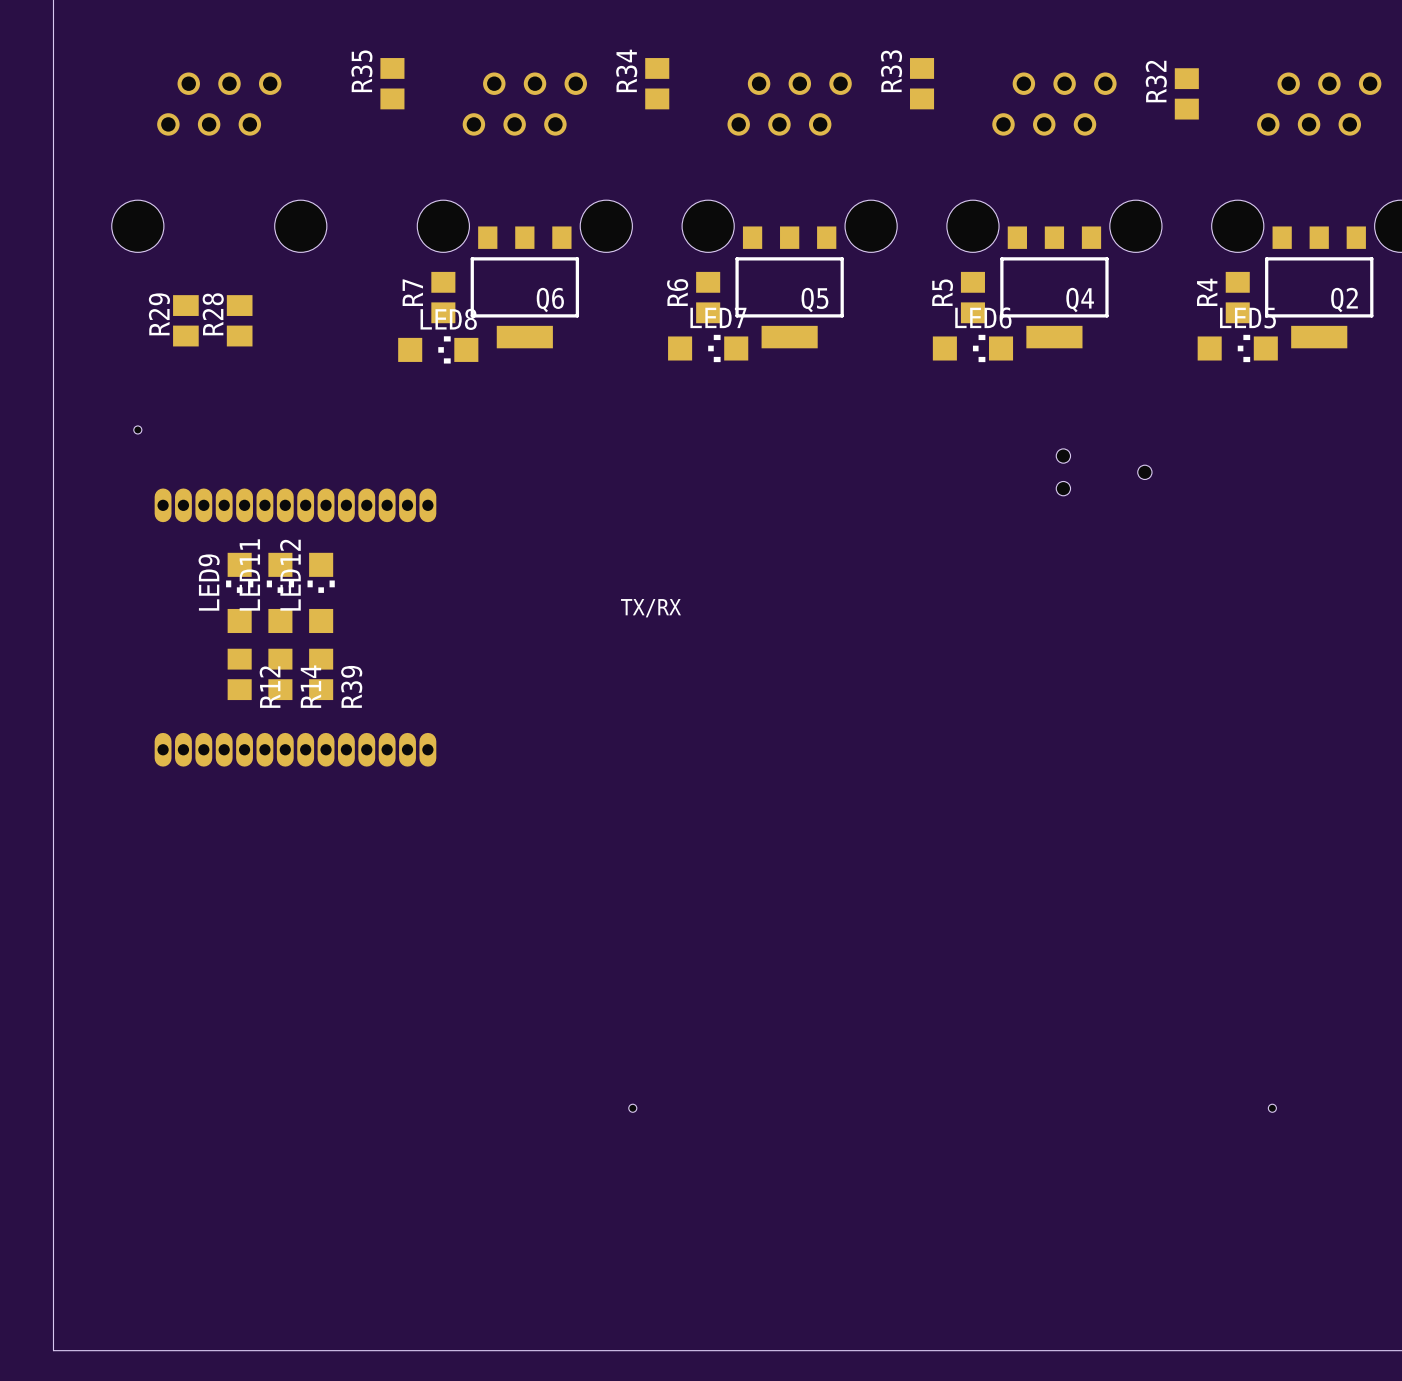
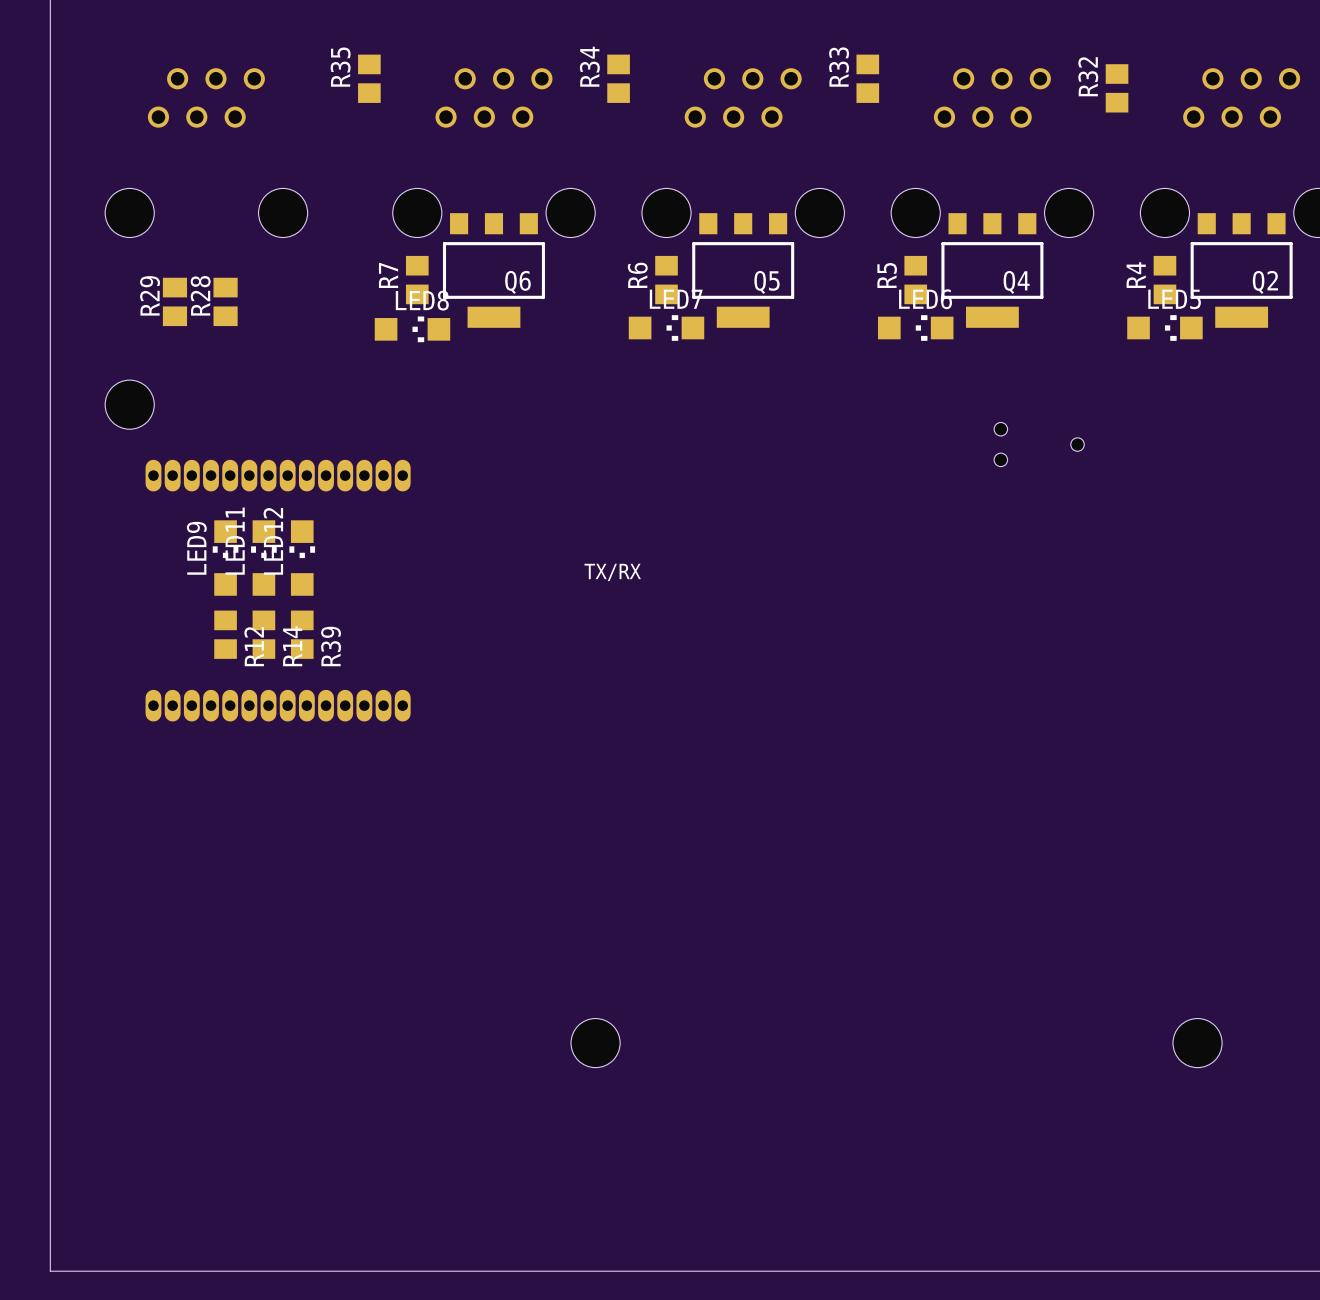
hole size: [133, 425, 142, 434] -> [105, 380, 155, 430]
hole size: [628, 1104, 637, 1113] -> [571, 1018, 621, 1068]
hole size: [1268, 1104, 1277, 1113] -> [1173, 1018, 1223, 1068]

